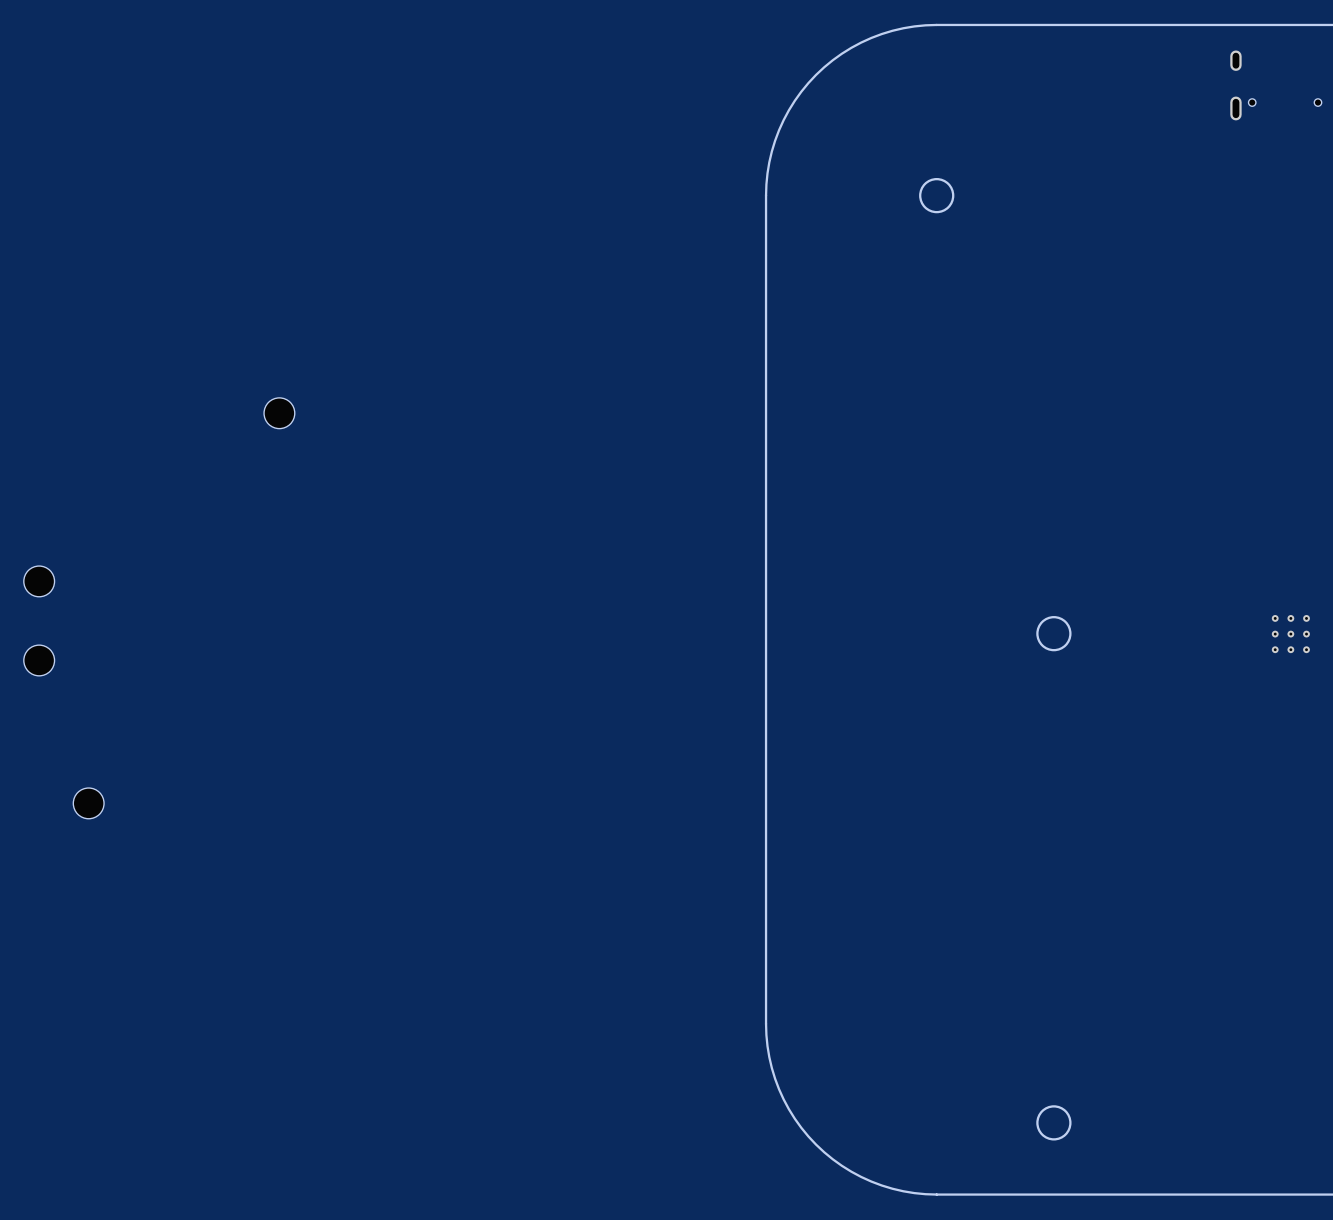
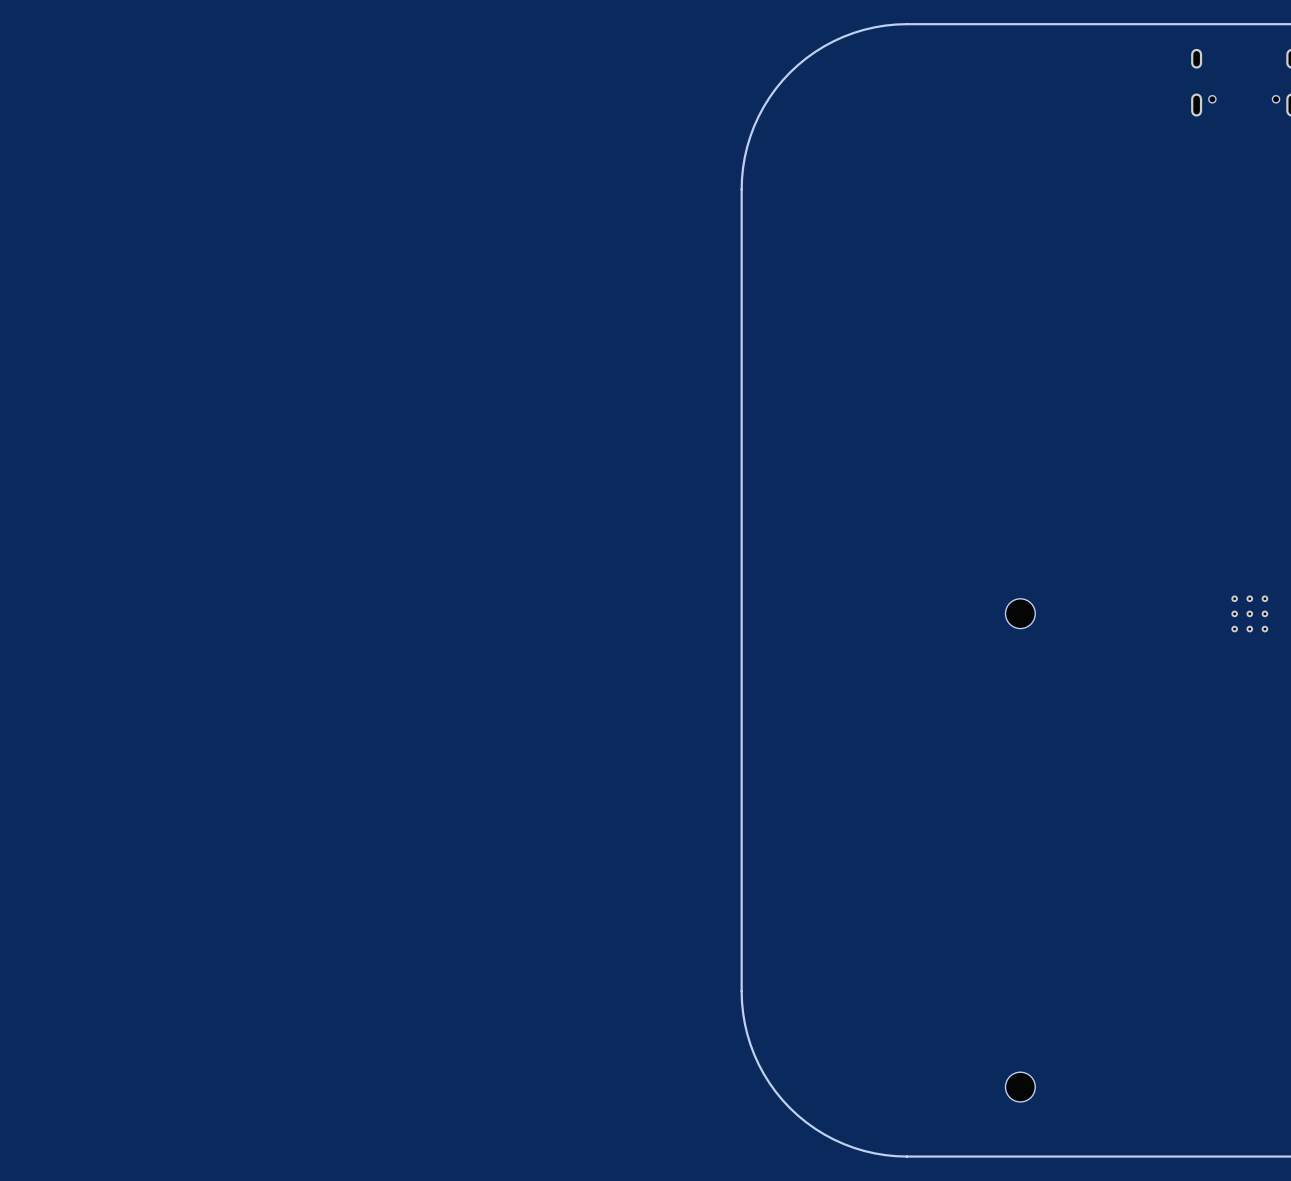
round board edge: [919, 177, 955, 214] -> none
part: (279, 413) -> none
part: (39, 581) -> none
round board edge: [1036, 616, 1072, 652] -> none
part: none -> (1020, 613)
part: (39, 660) -> none
part: (88, 803) -> none
round board edge: [1036, 1105, 1072, 1141] -> none
part: none -> (1020, 1087)

